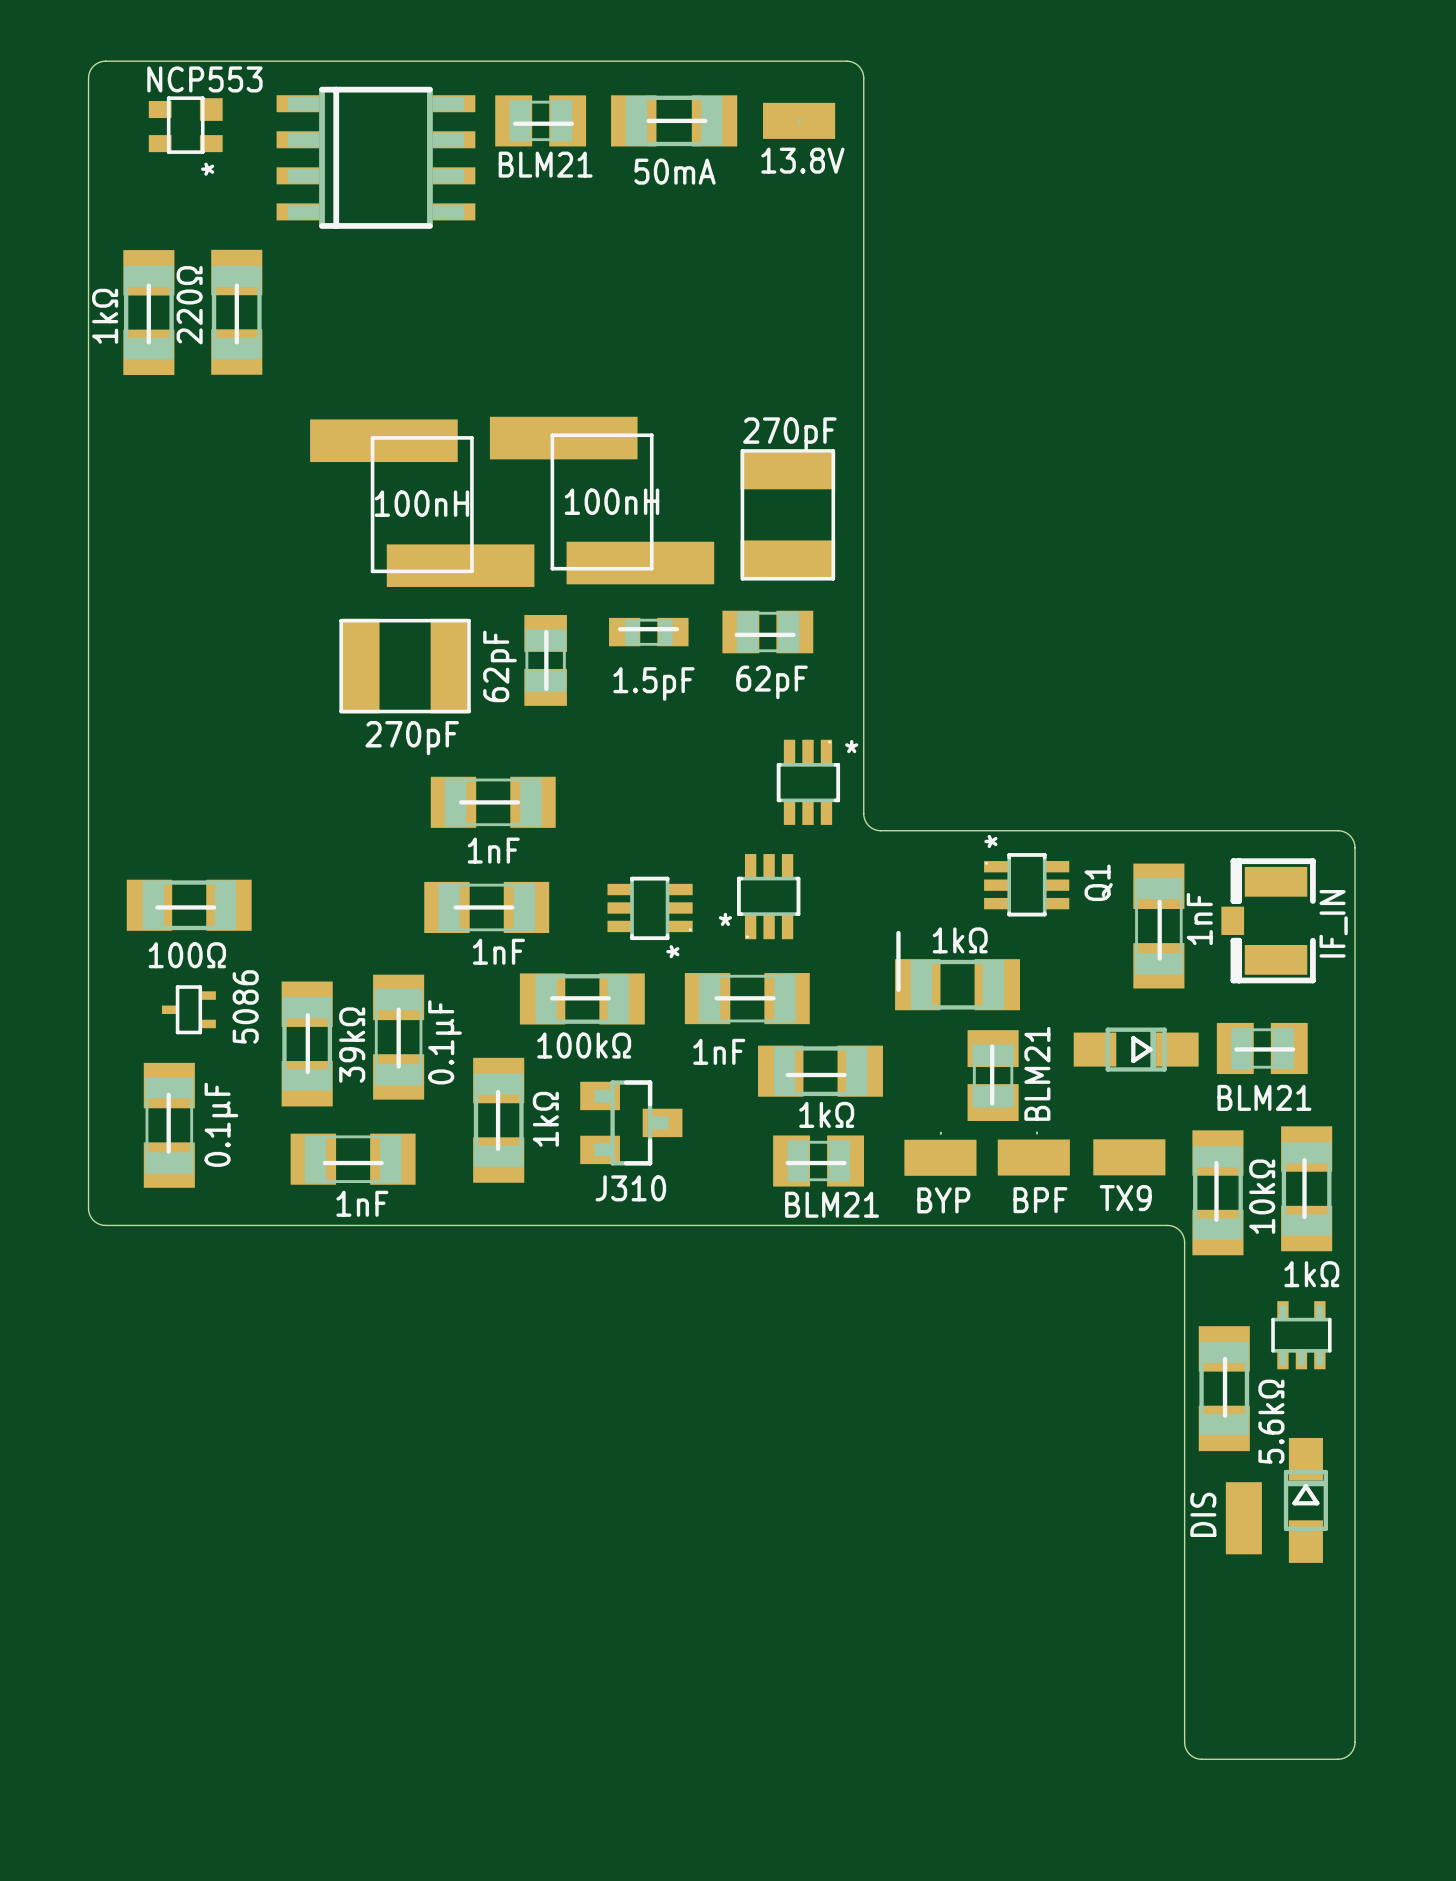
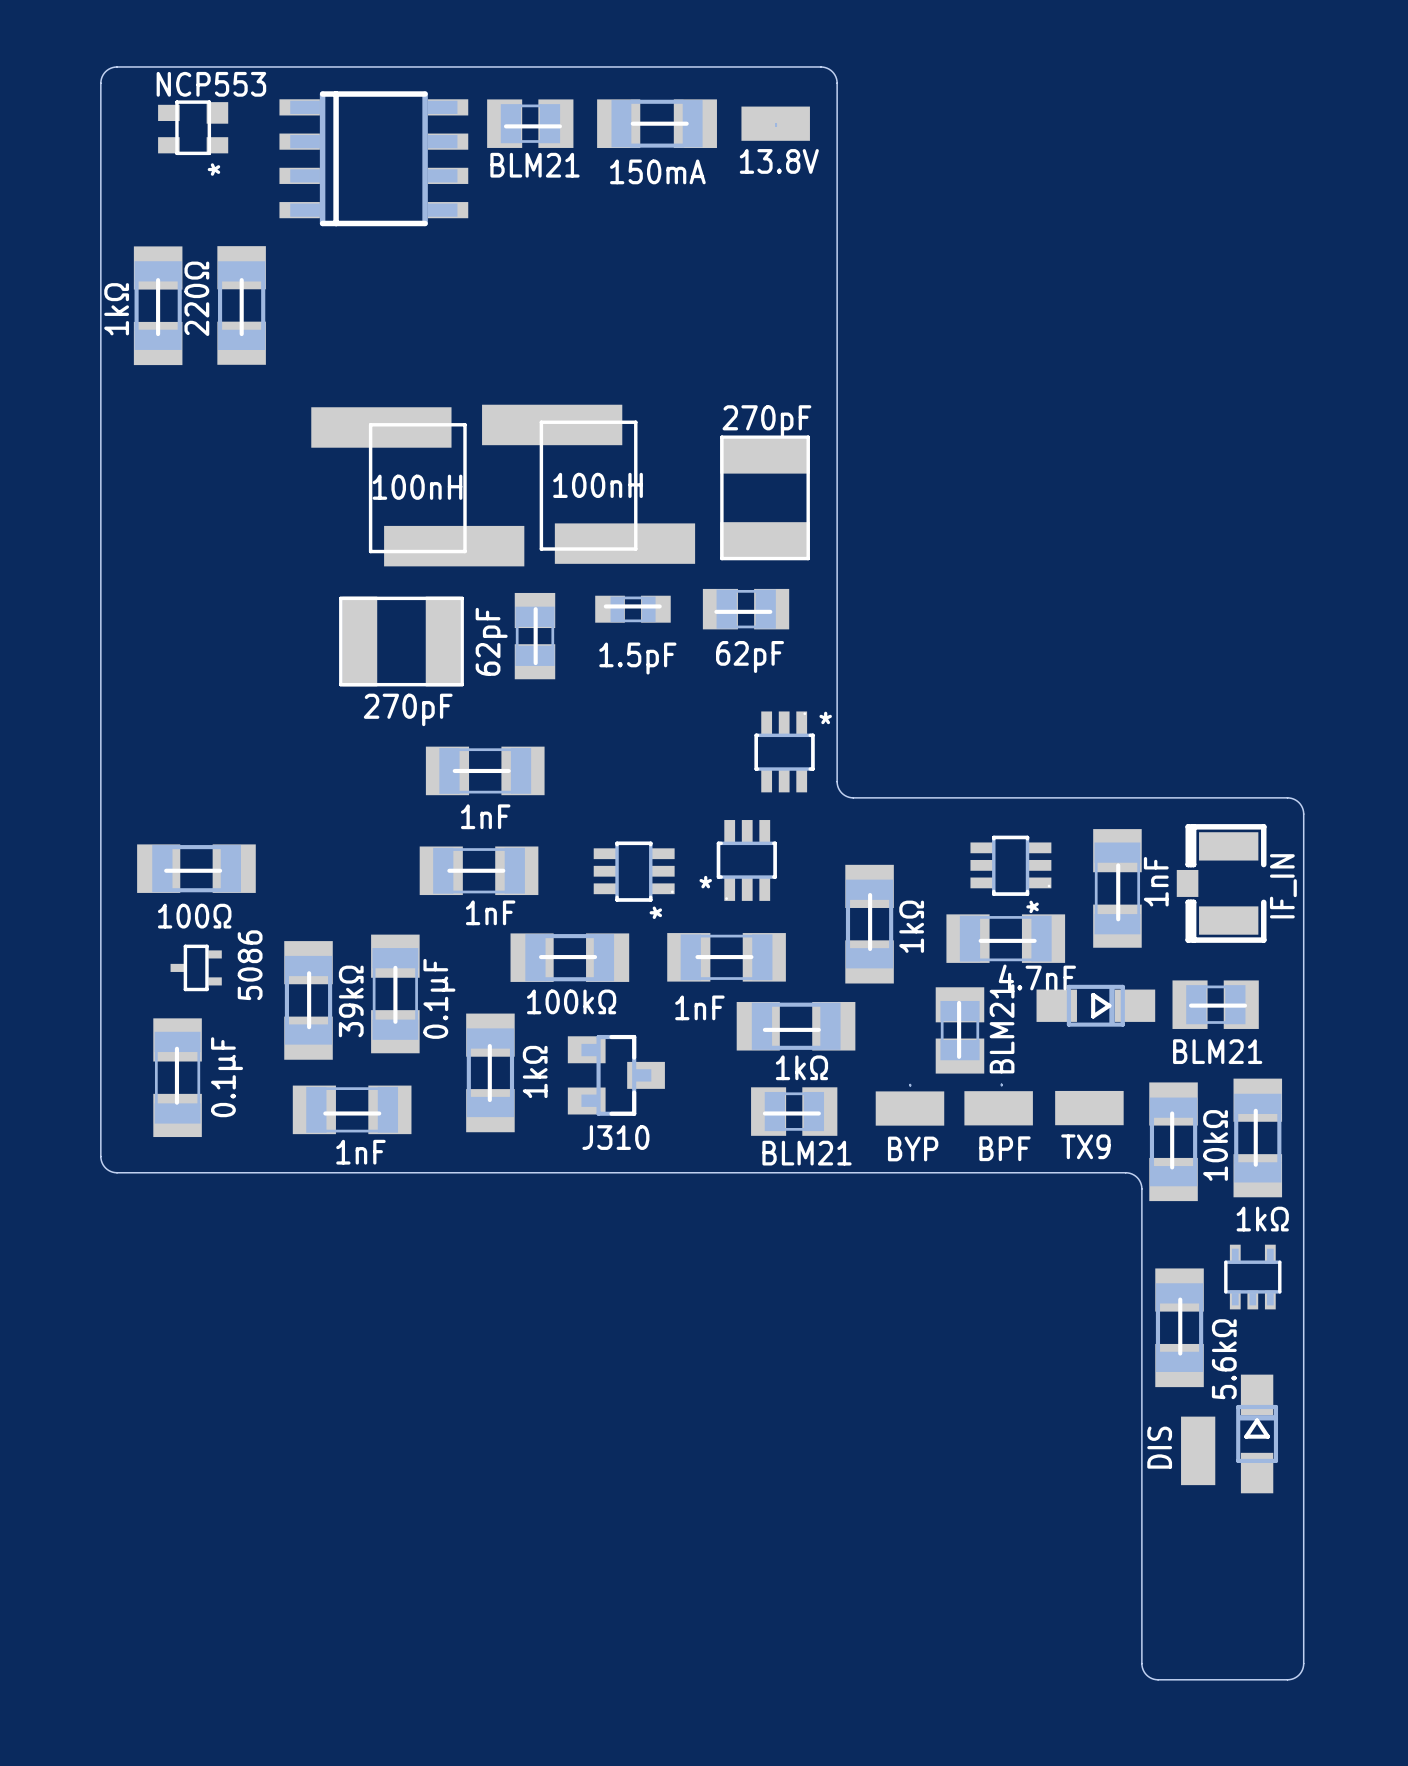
part value: 50mA (675, 171) -> 150mA (657, 171)
Q1: (1026, 884) -> none
part: none -> (1010, 865)
part: none -> 4.7nF (1005, 938)
line: none -> (1034, 940) (980, 940)
part rotation: 0° (957, 984) -> 90° clockwise (869, 924)

